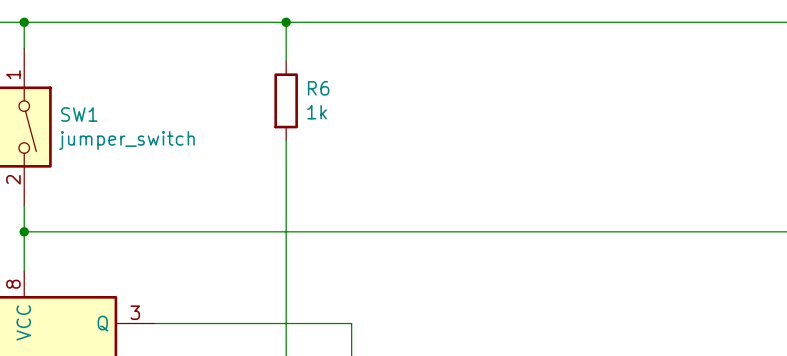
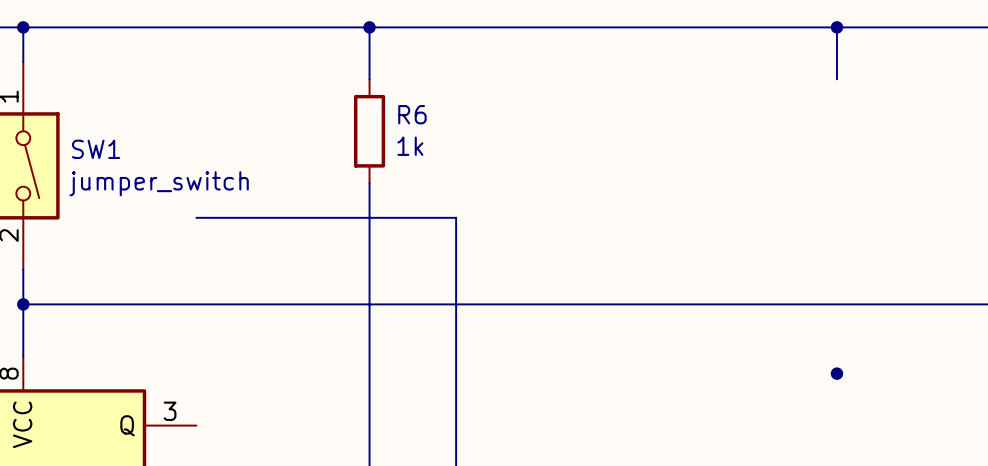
wire: none -> (836, 27) (836, 79)
junction: none -> (836, 27)
junction: none -> (836, 373)
wire: (155, 323) (351, 323) -> (196, 217) (456, 217) (456, 425)

